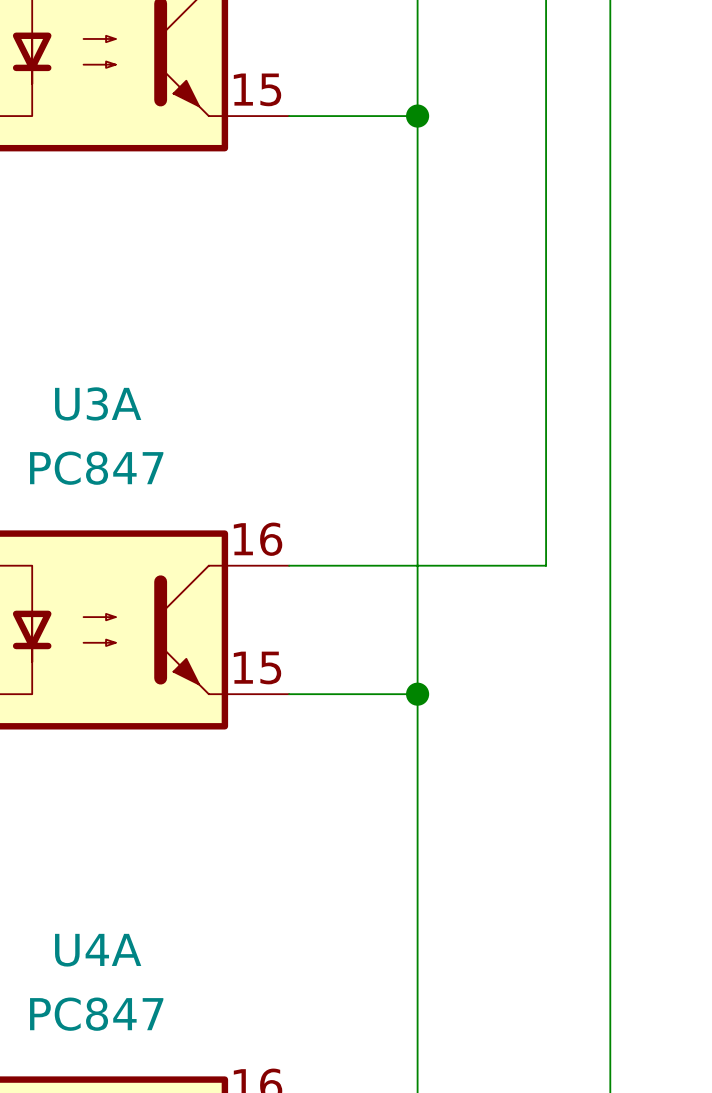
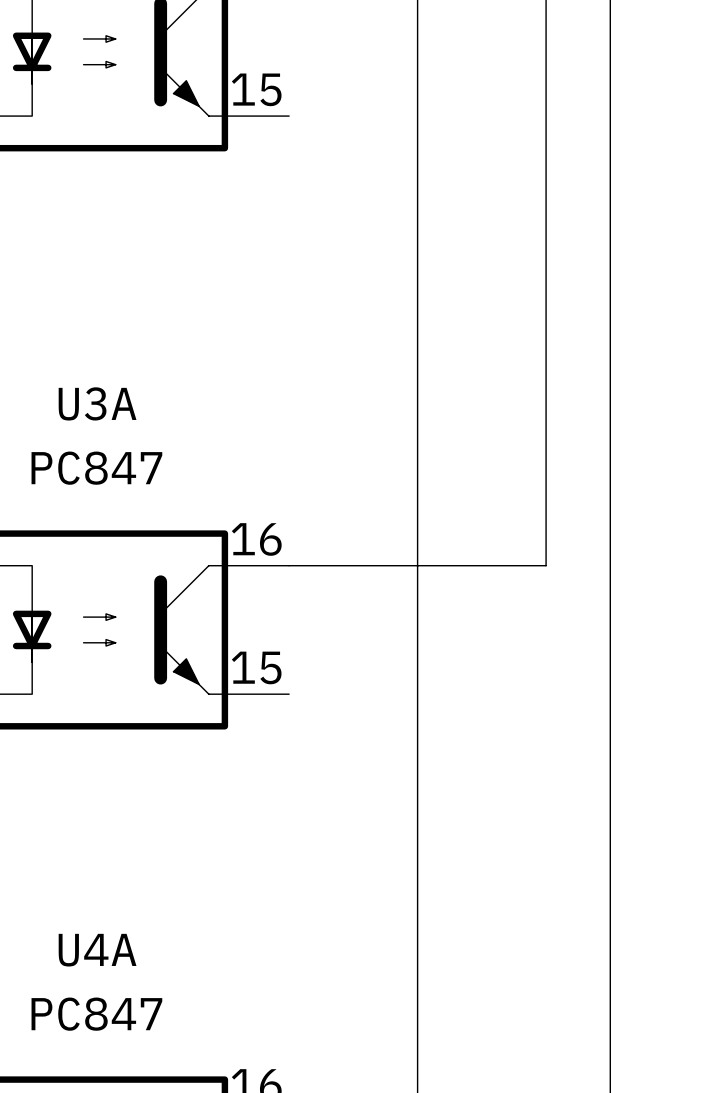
wire: (289, 116) (417, 116) -> none
junction: (417, 116) -> none
wire: (289, 694) (417, 694) -> none
junction: (417, 694) -> none

